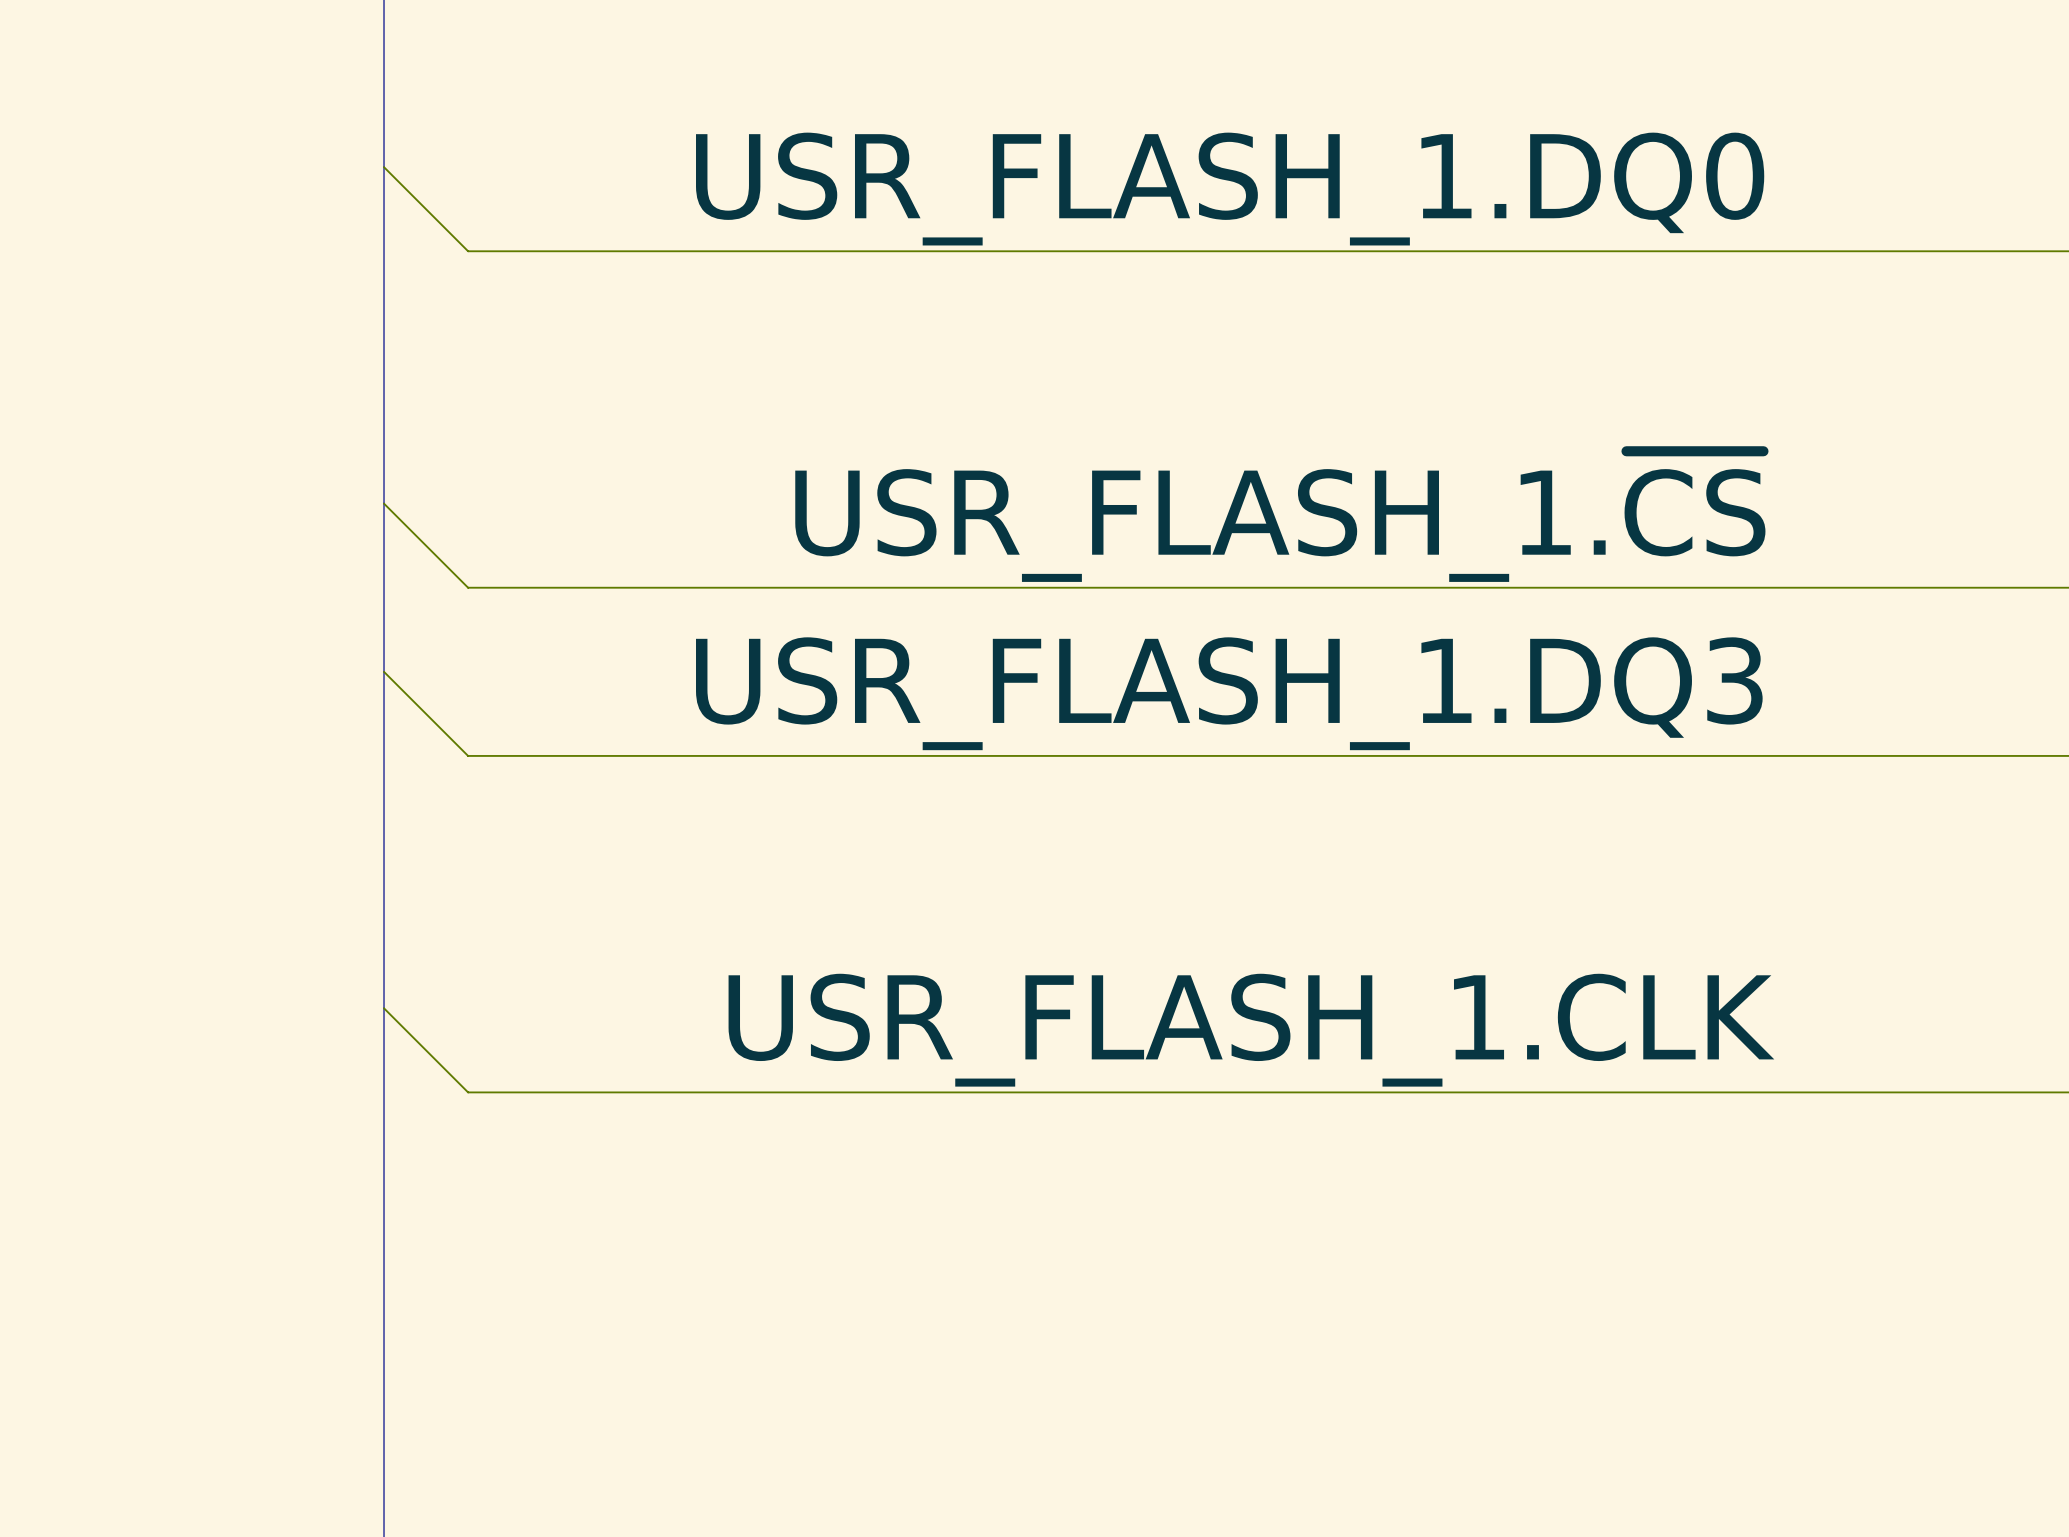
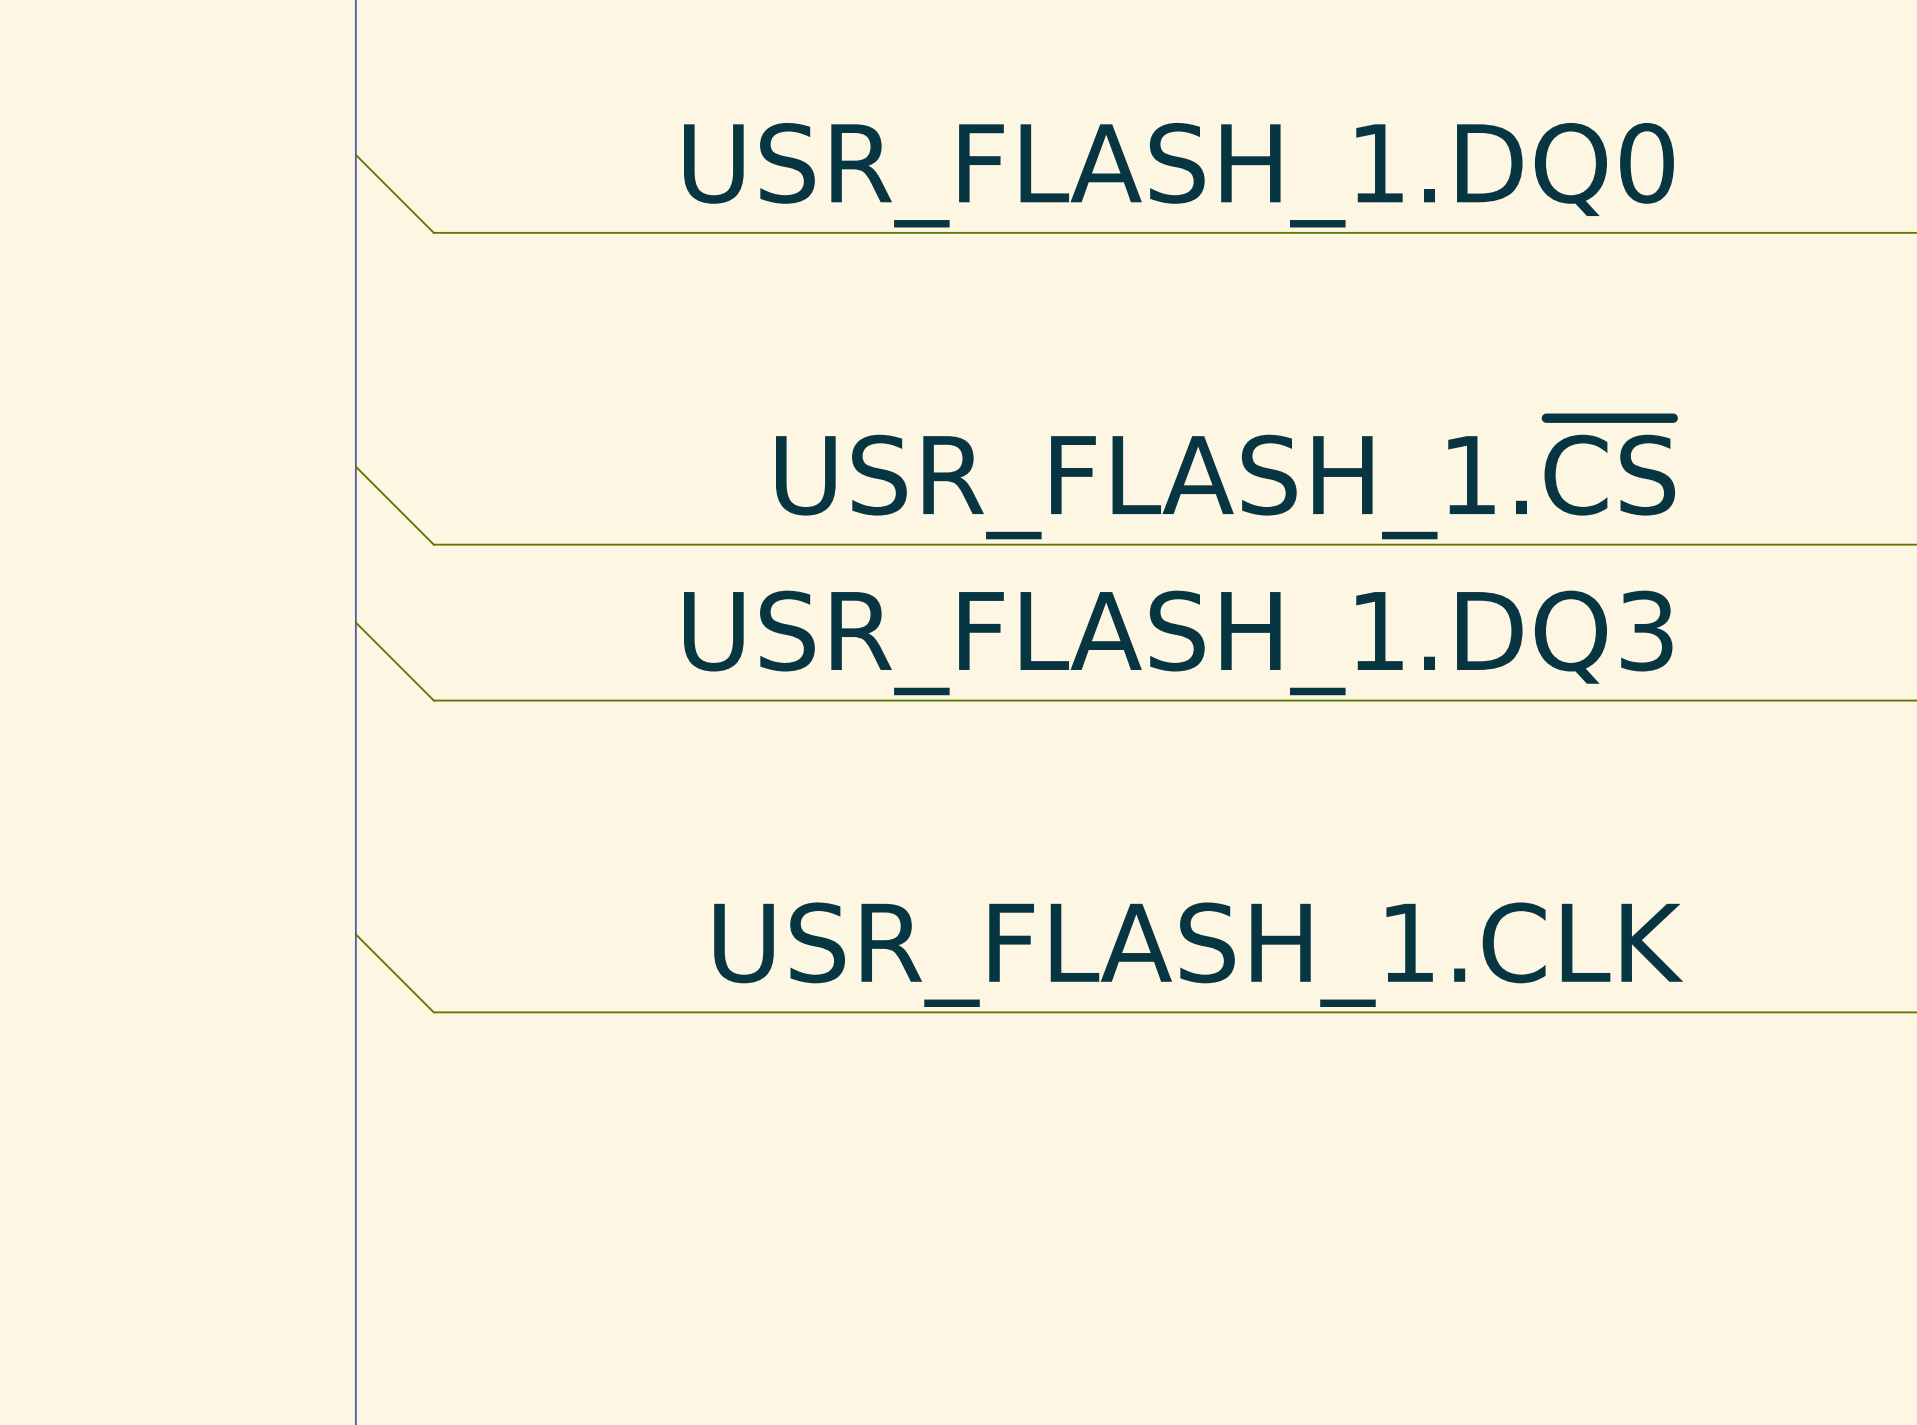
label position: USR_FLASH_1.DQ0 (1230, 189) -> USR_FLASH_1.DQ0 (1178, 175)
label position: USR_FLASH_1.~{CS} (1280, 516) -> USR_FLASH_1.~{CS} (1225, 478)
label position: USR_FLASH_1.DQ3 (1229, 693) -> USR_FLASH_1.DQ3 (1178, 642)
label position: USR_FLASH_1.CLK (1251, 1030) -> USR_FLASH_1.CLK (1198, 954)

